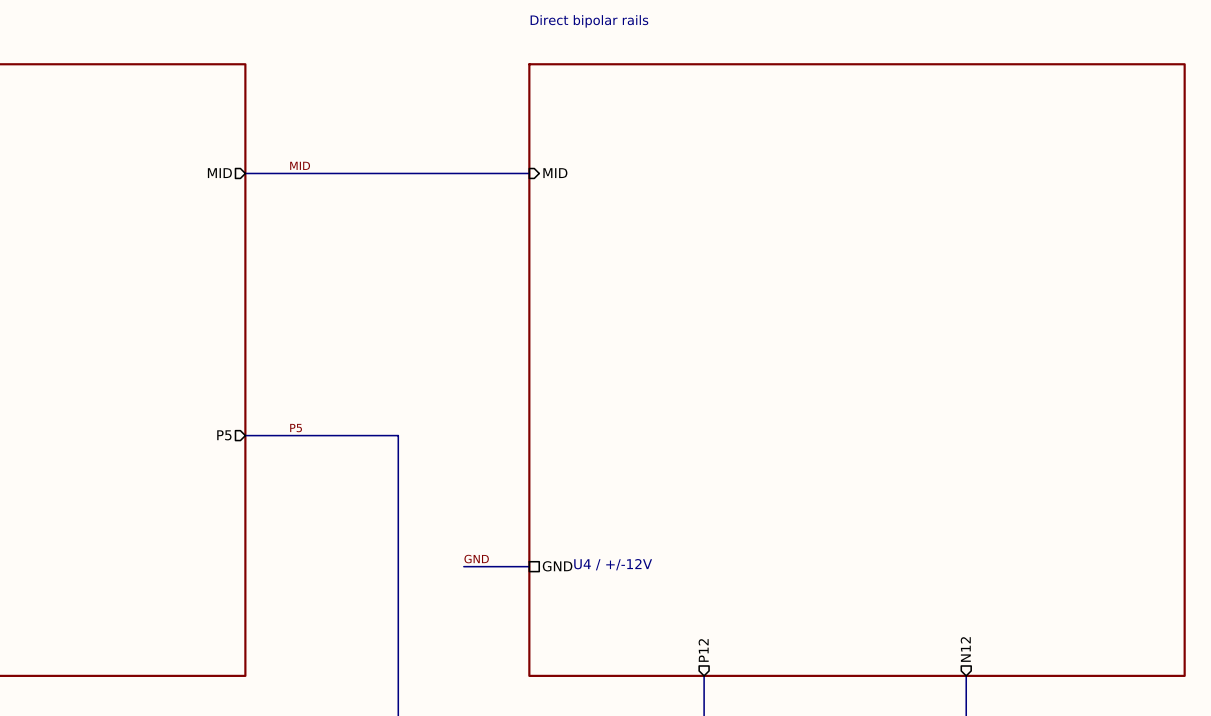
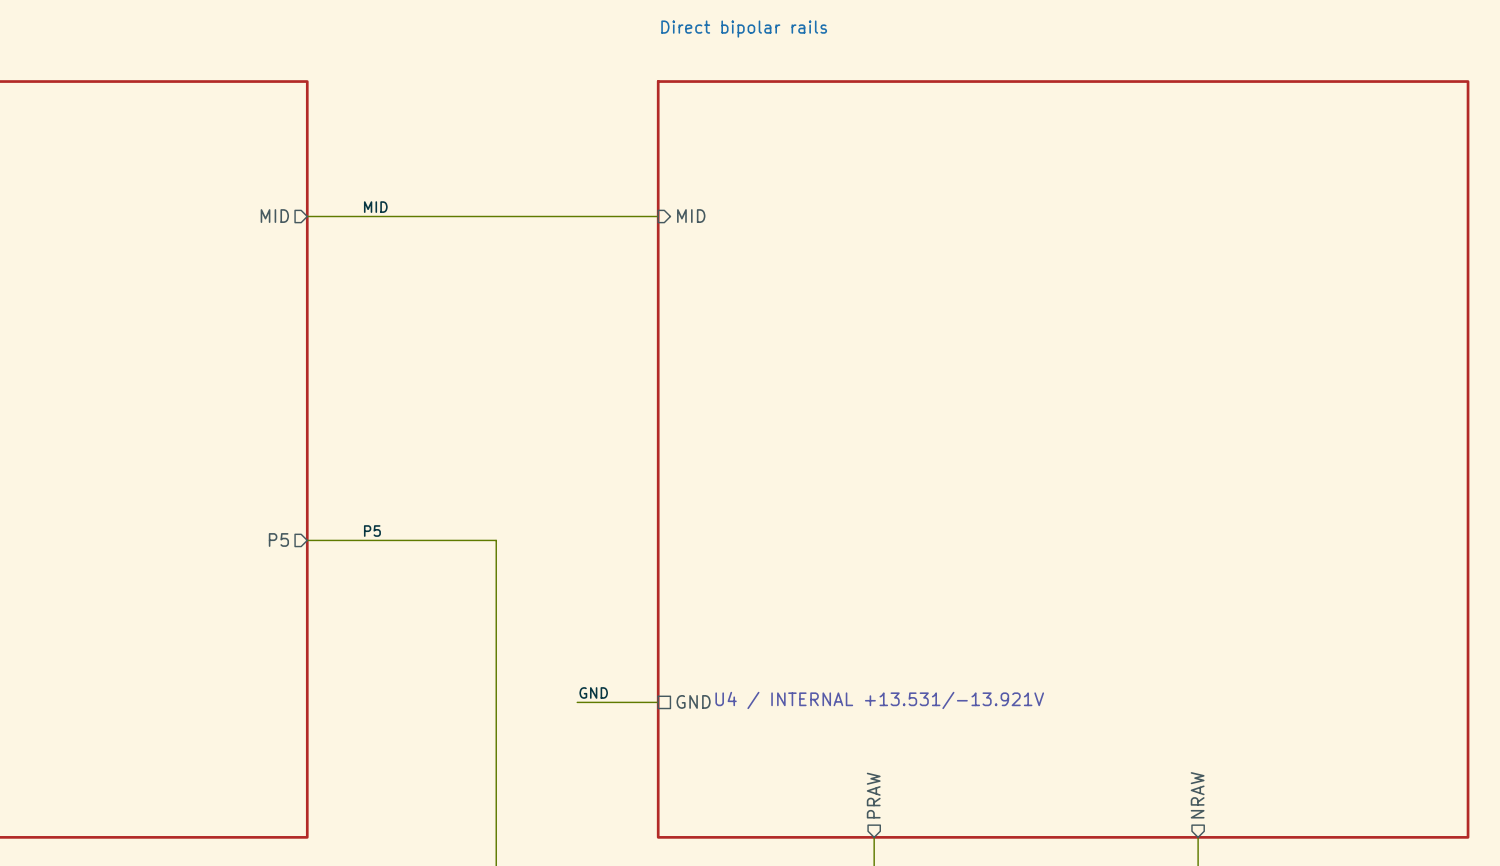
text: U4 / +/-12V (613, 564) -> U4 / INTERNAL +13.531/-13.921V (879, 700)
sheet pin: N12 (965, 649) -> NRAW (1197, 795)
sheet pin: P12 (703, 650) -> PRAW (873, 795)

